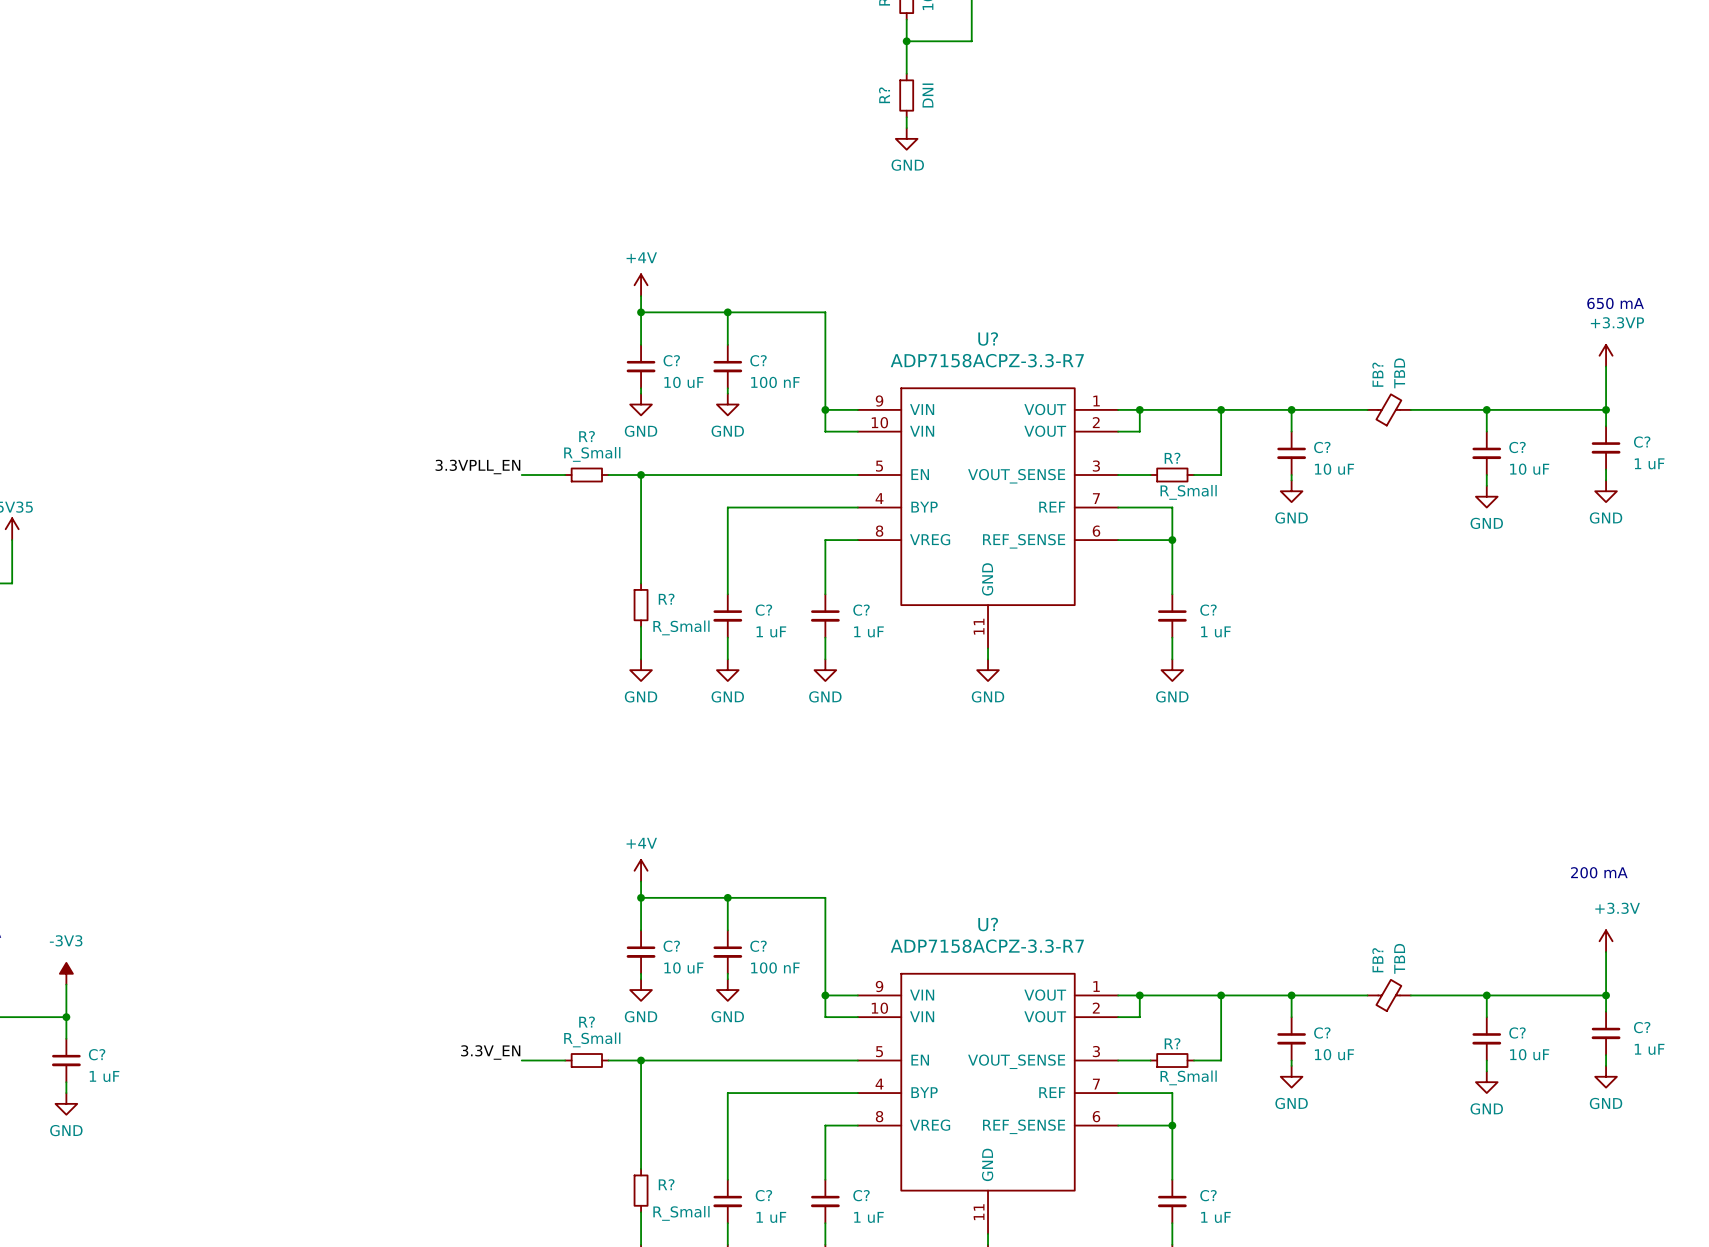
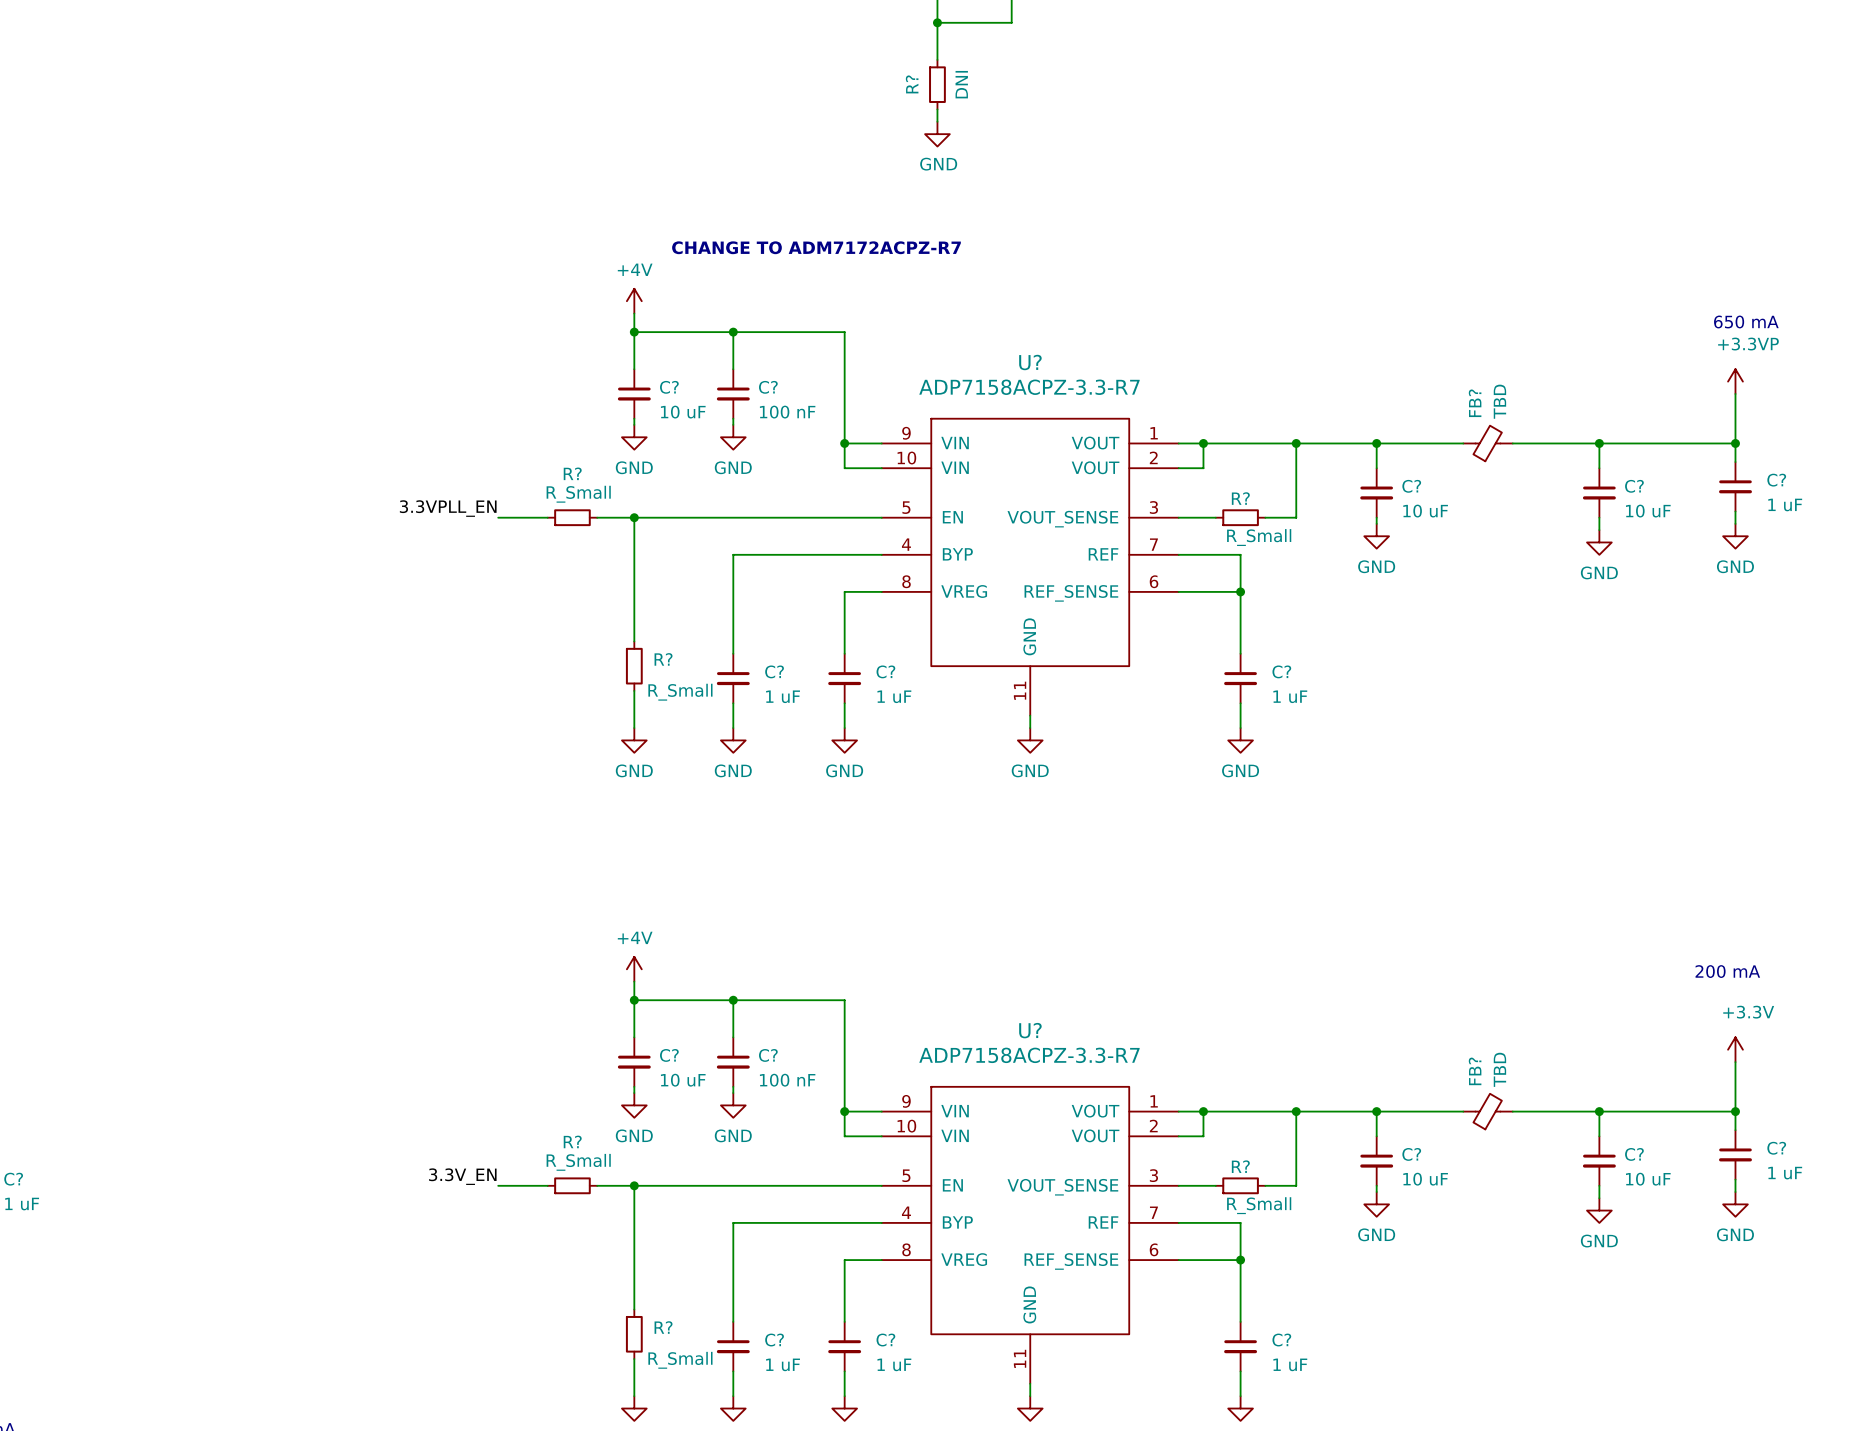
text: none -> CHANGE TO ADM7172ACPZ-R7 (816, 247)

